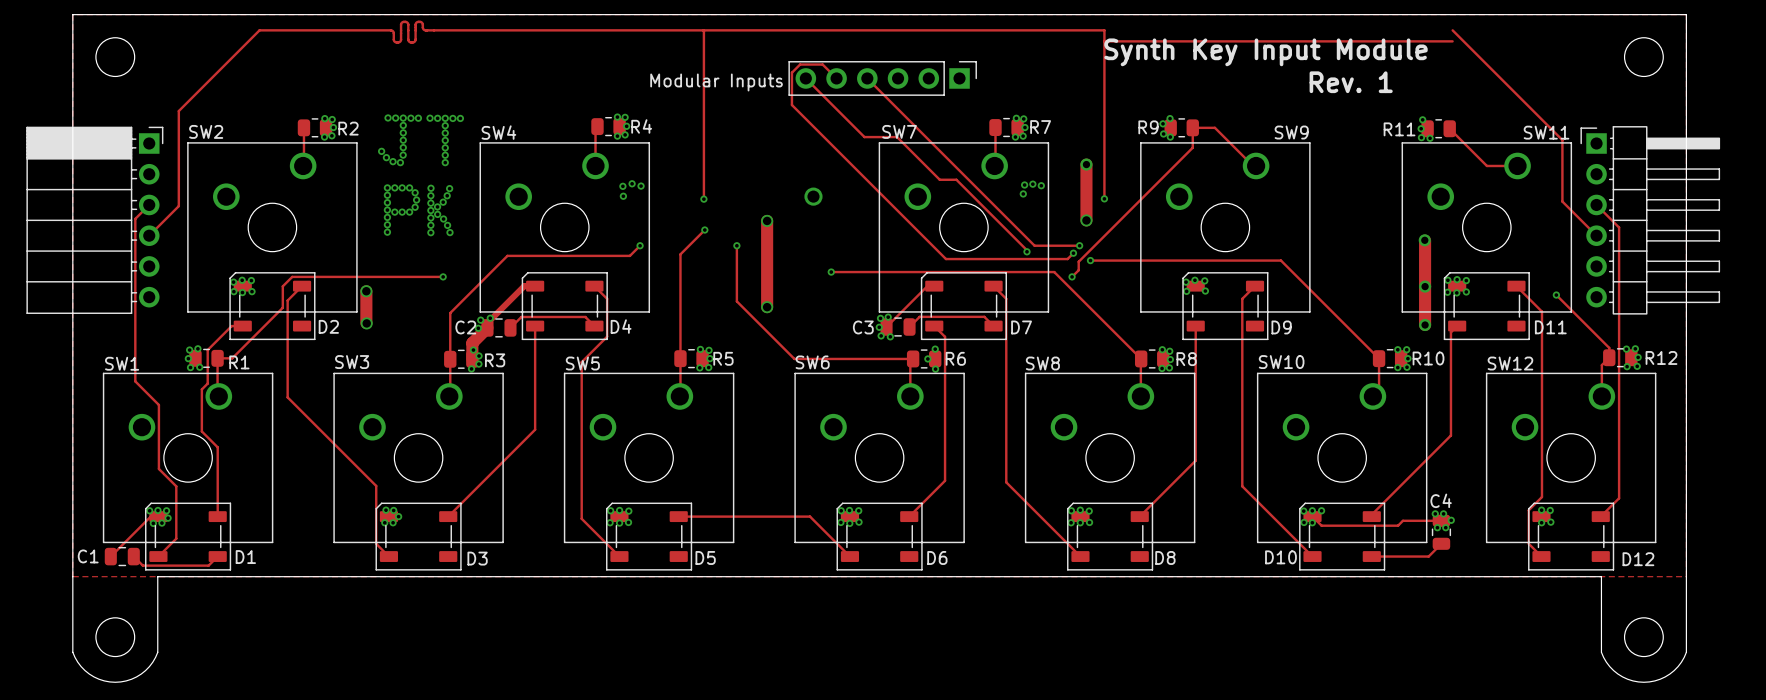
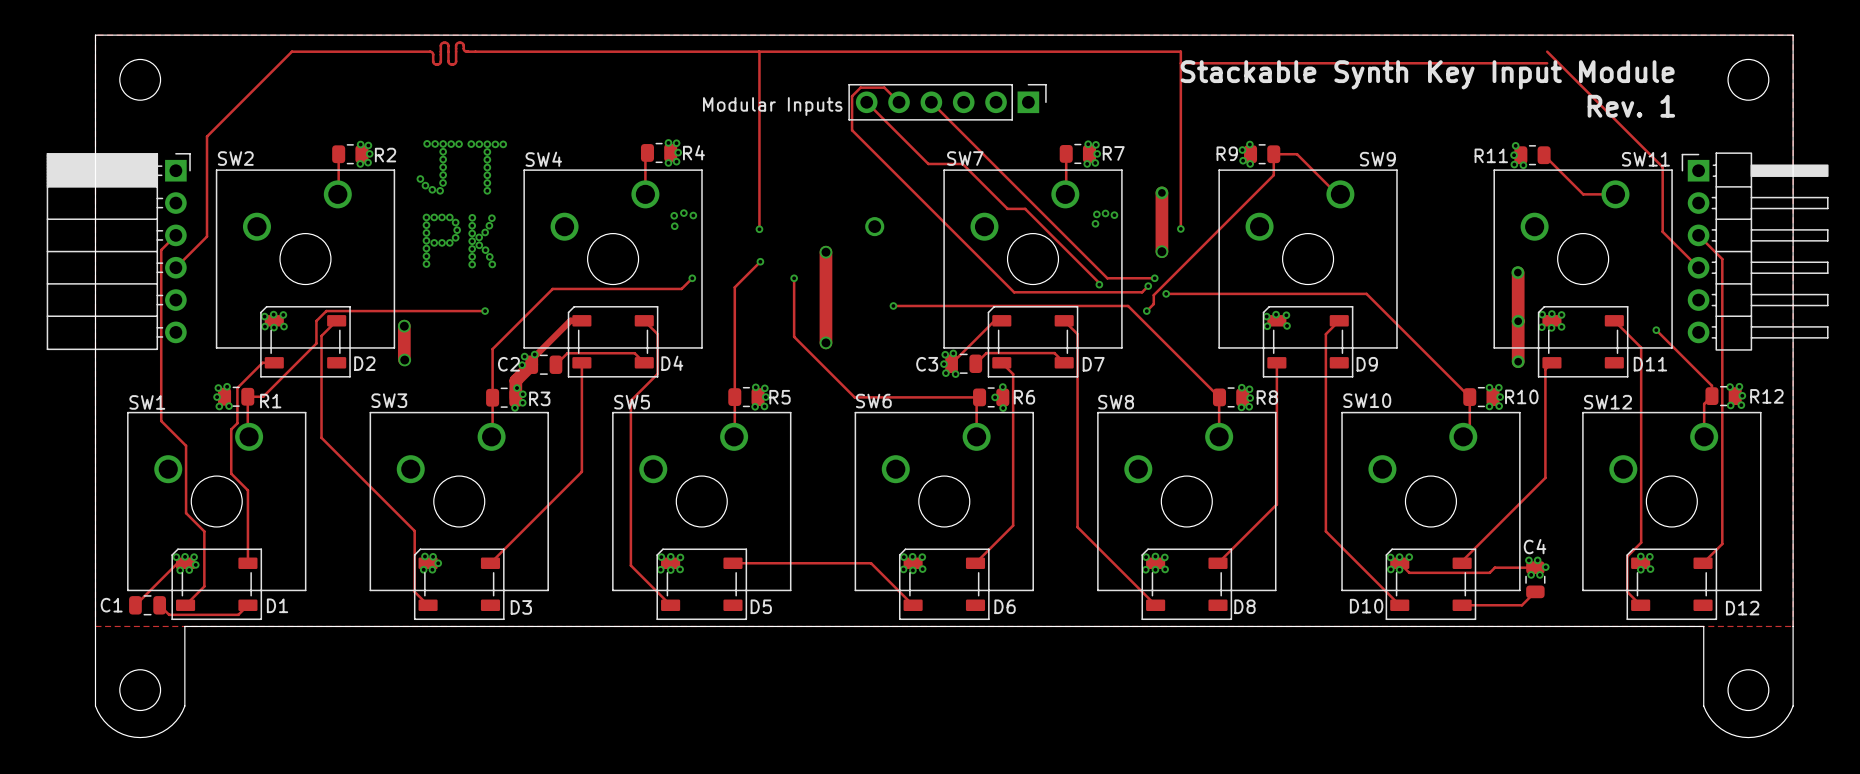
text: Synth Key Input Module (1265, 52) -> Stackable Synth Key Input Module (1427, 74)
text position: Rev. 1 (1351, 82) -> Rev. 1 (1631, 106)

